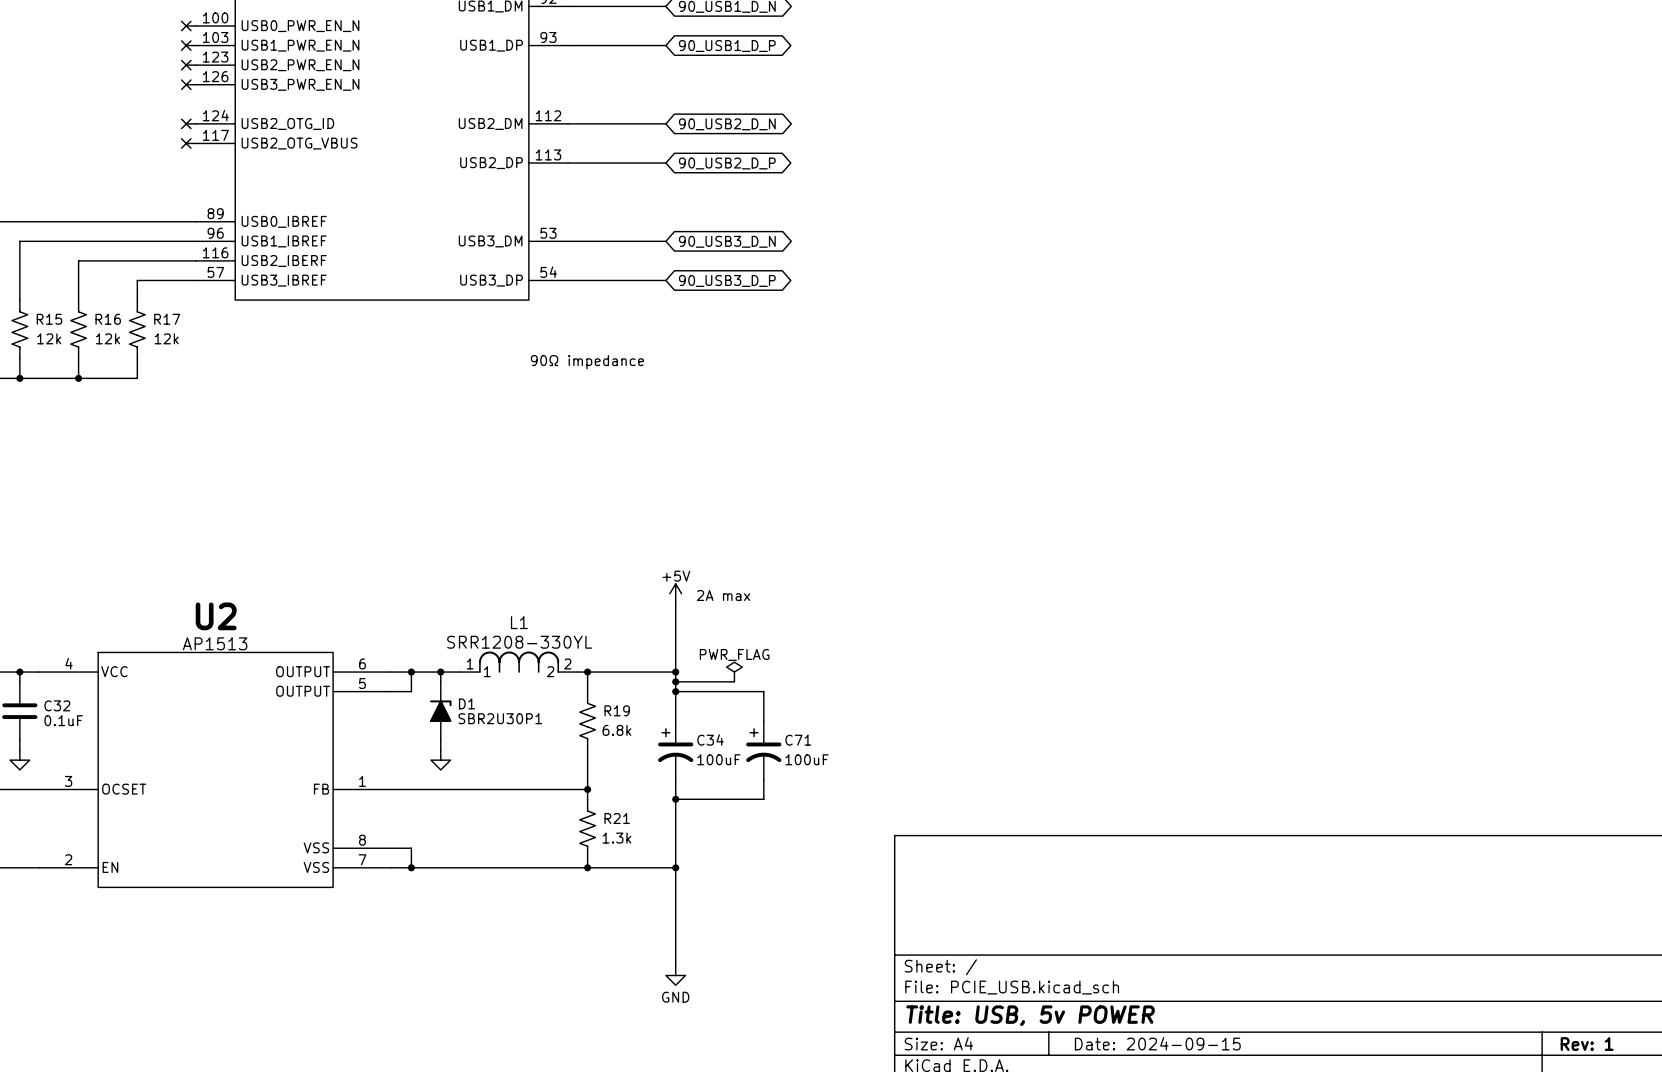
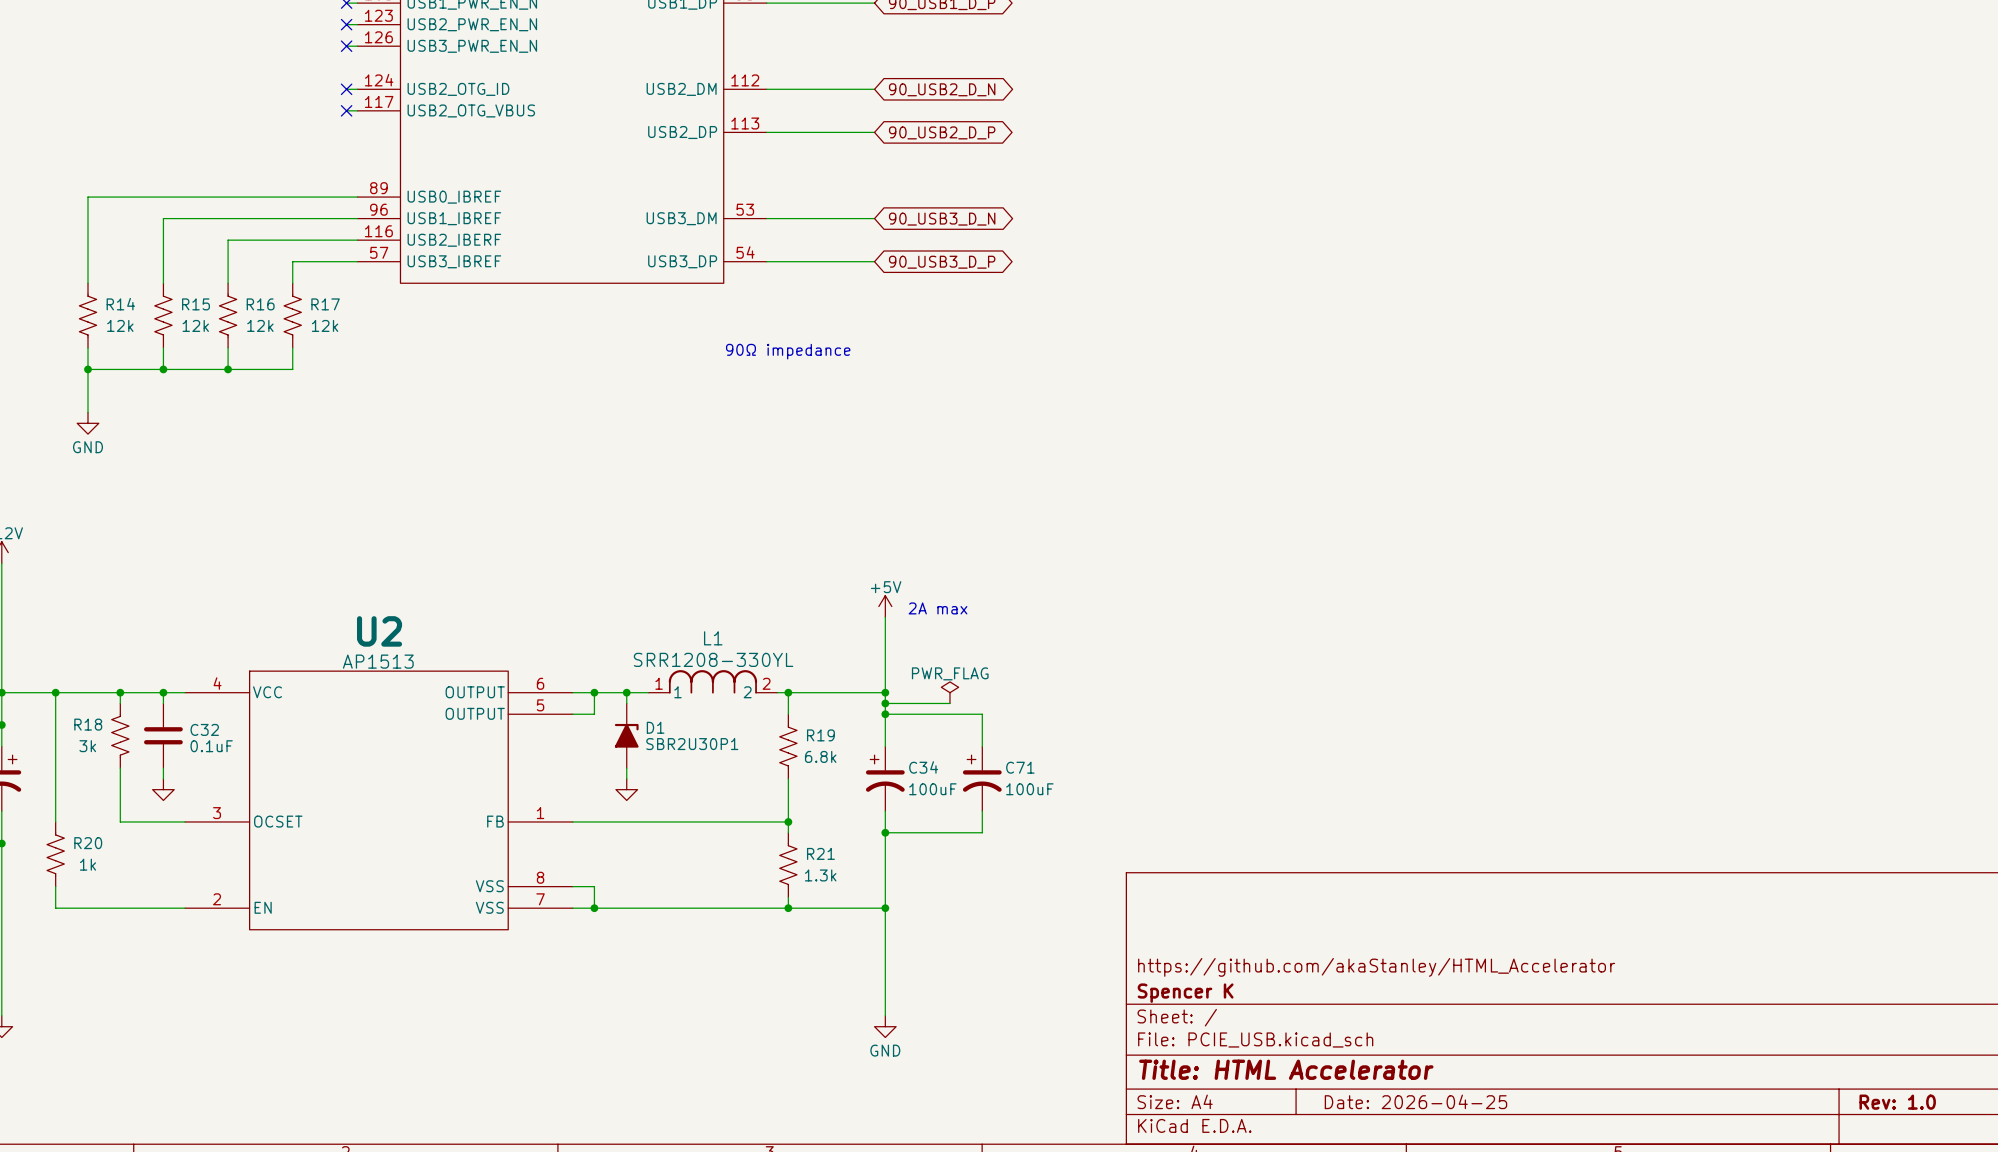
title block: none -> https://github.com/akaStanley/HTML_Accelerator (1376, 967)
title block: none -> Spencer K (1185, 993)
title block: Title: USB, 5v POWER (1030, 1015) -> Title: HTML Accelerator (1286, 1069)
title block: Date: 2024-09-15 (1157, 1043) -> Date: 2026-04-25 (1415, 1101)
title block: Rev: 1 (1587, 1044) -> Rev: 1.0 (1897, 1102)

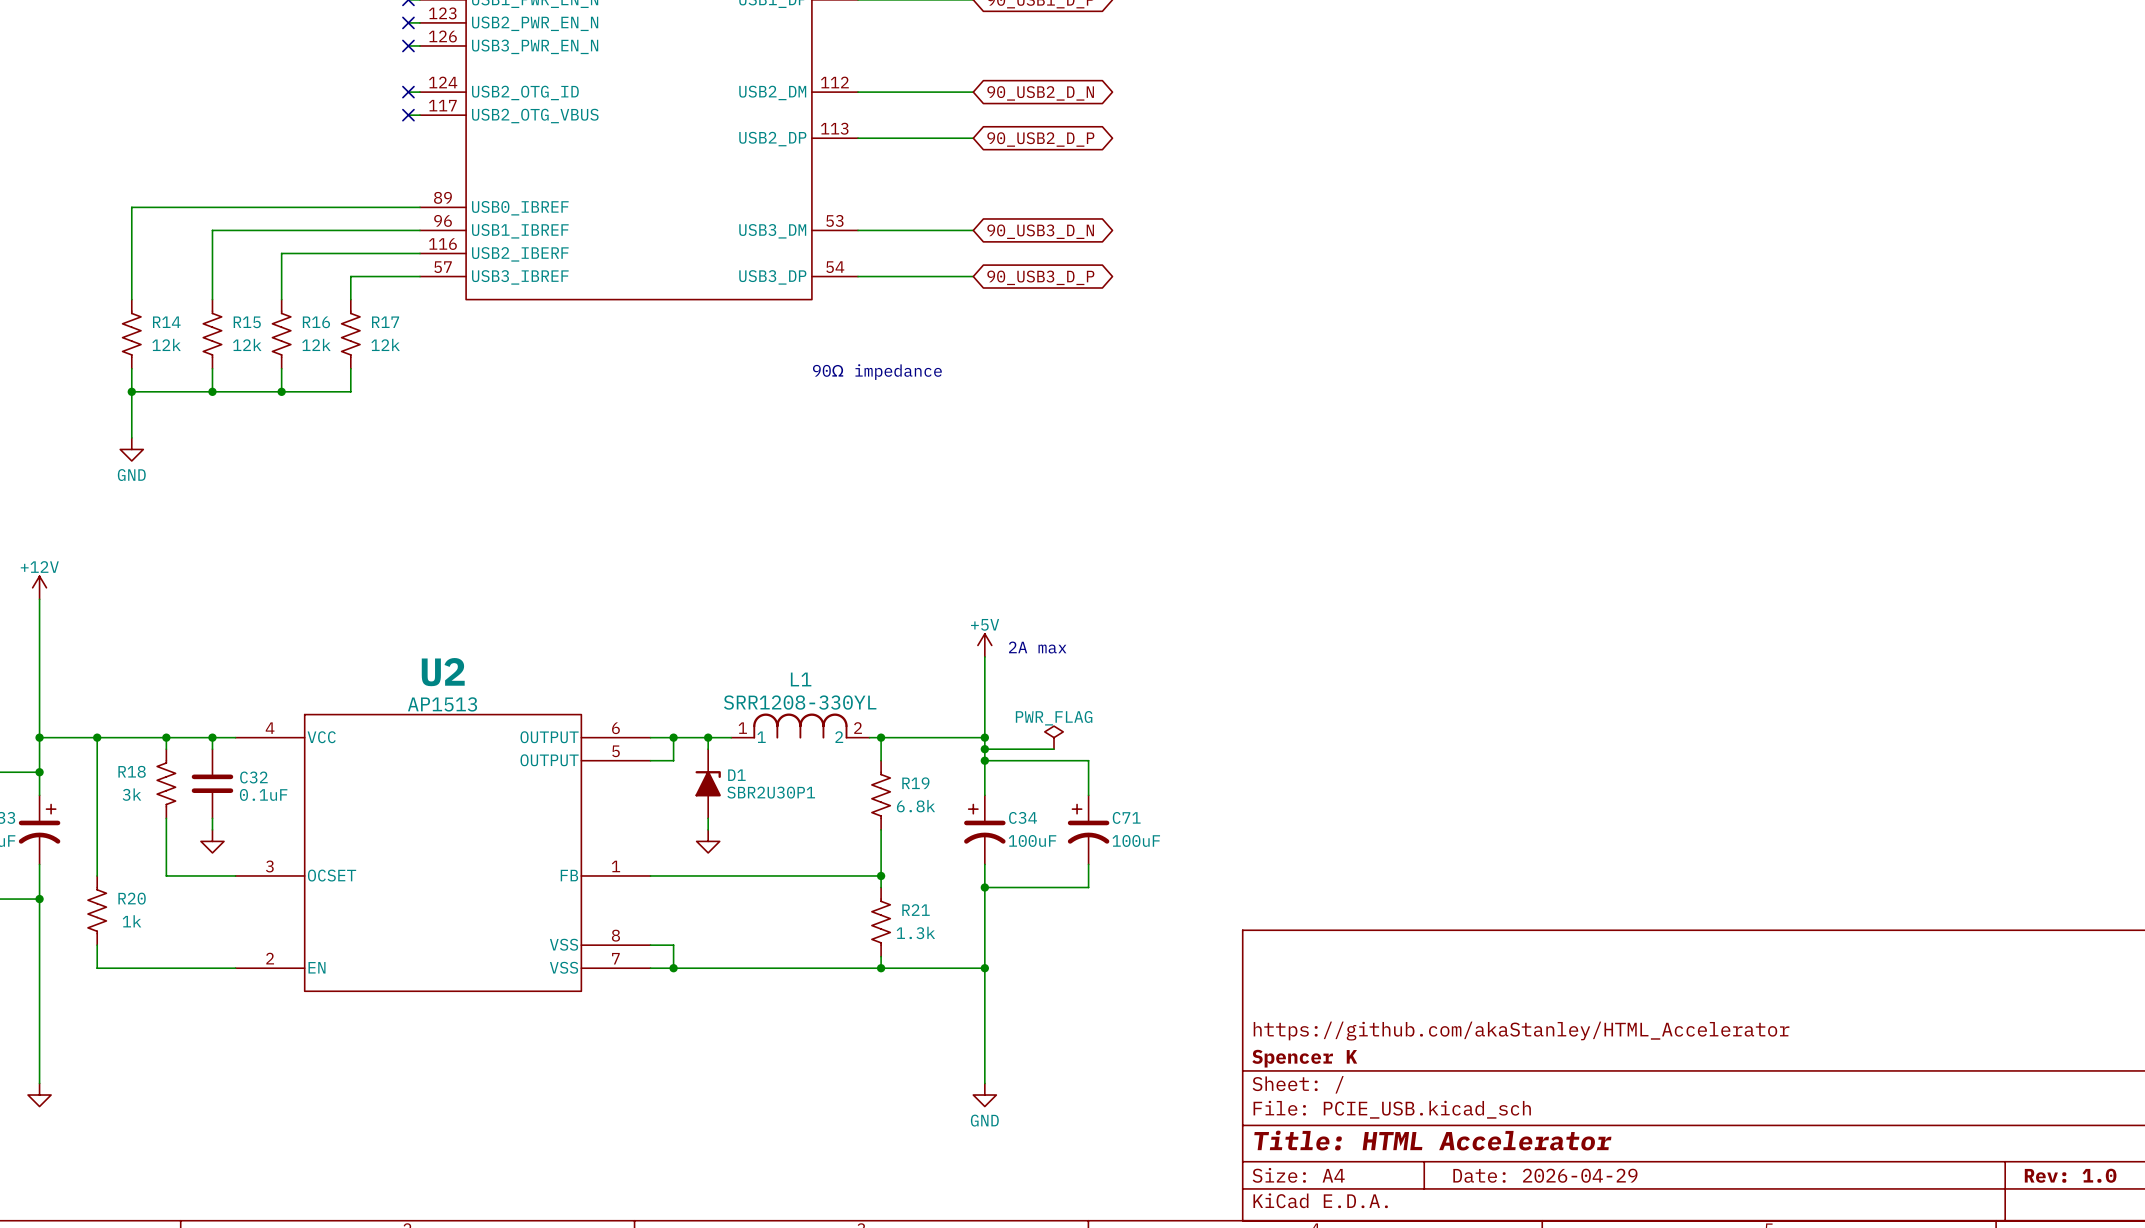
title block: Date: 2026-04-25 (1415, 1101) -> Date: 2026-04-29 (1545, 1175)

